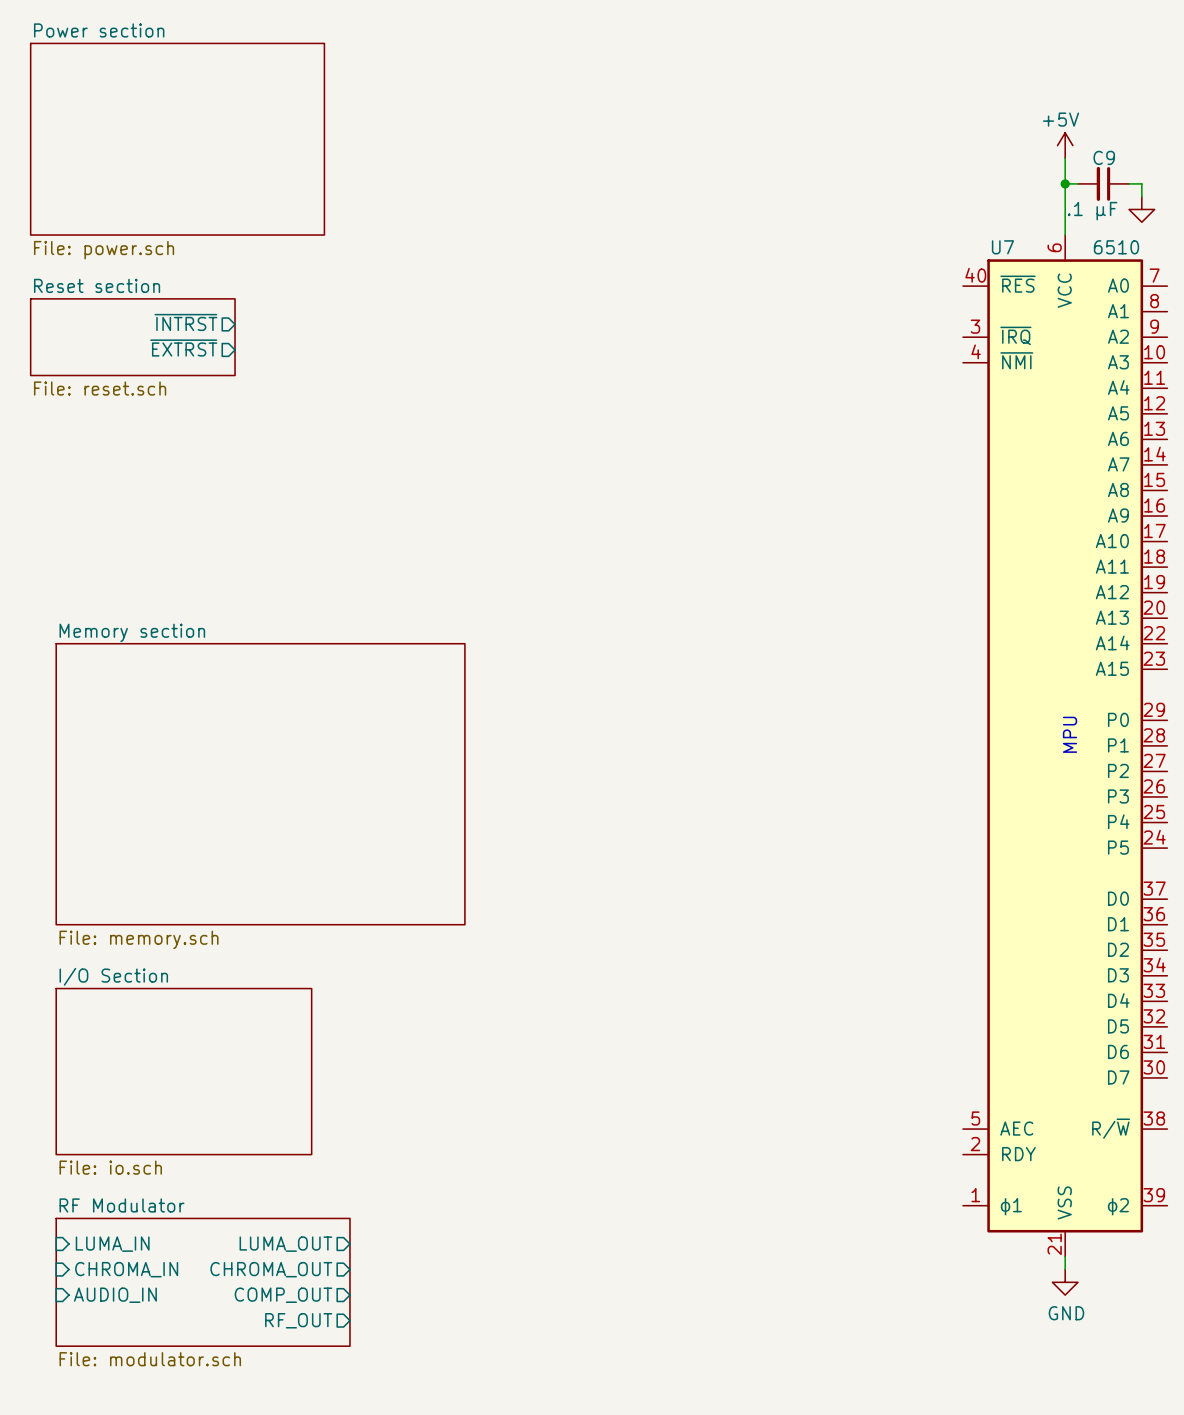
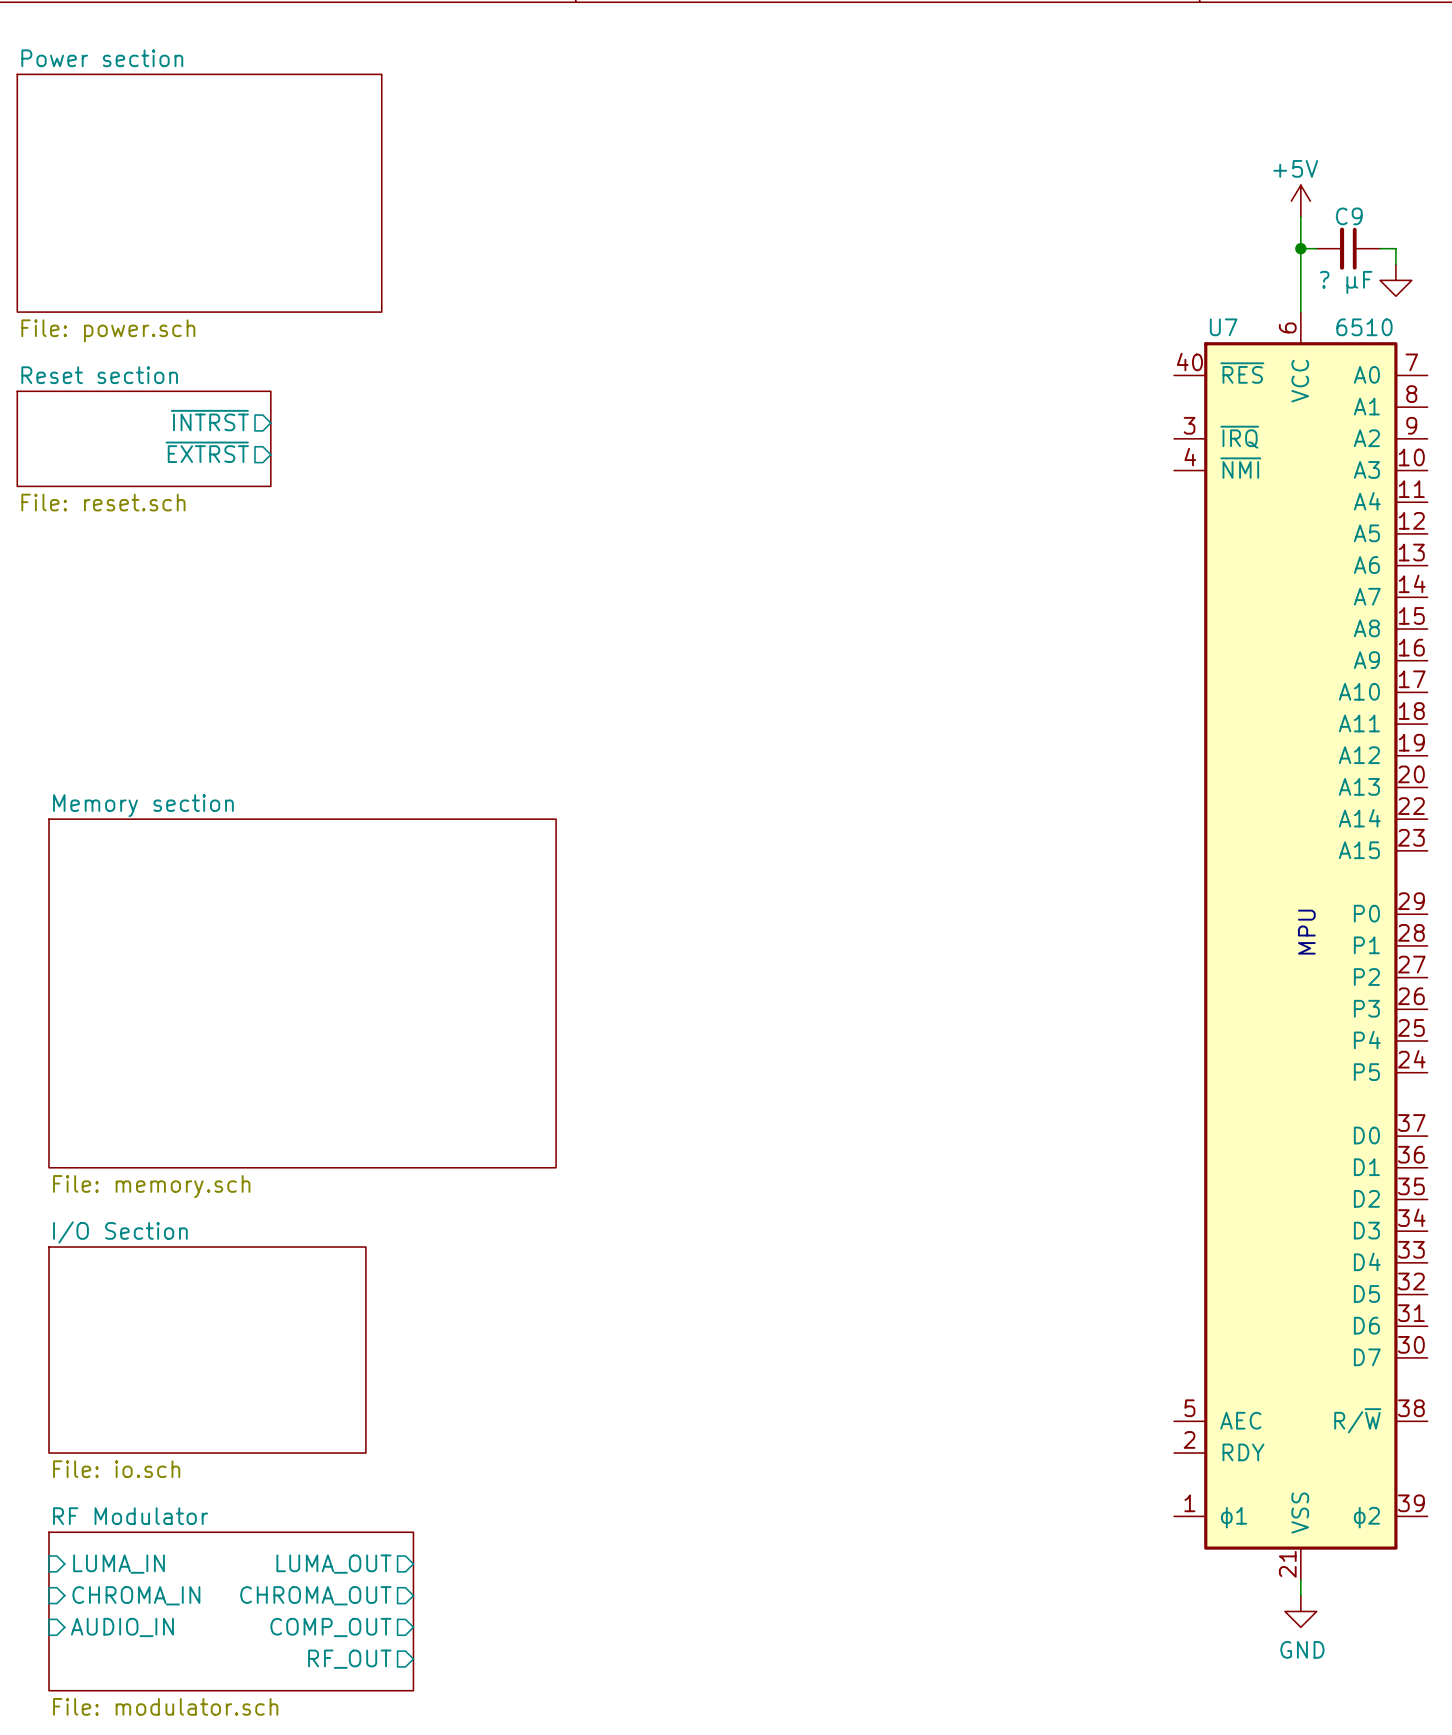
C9 value: .1 μF (1092, 211) -> ? μF (1346, 282)

